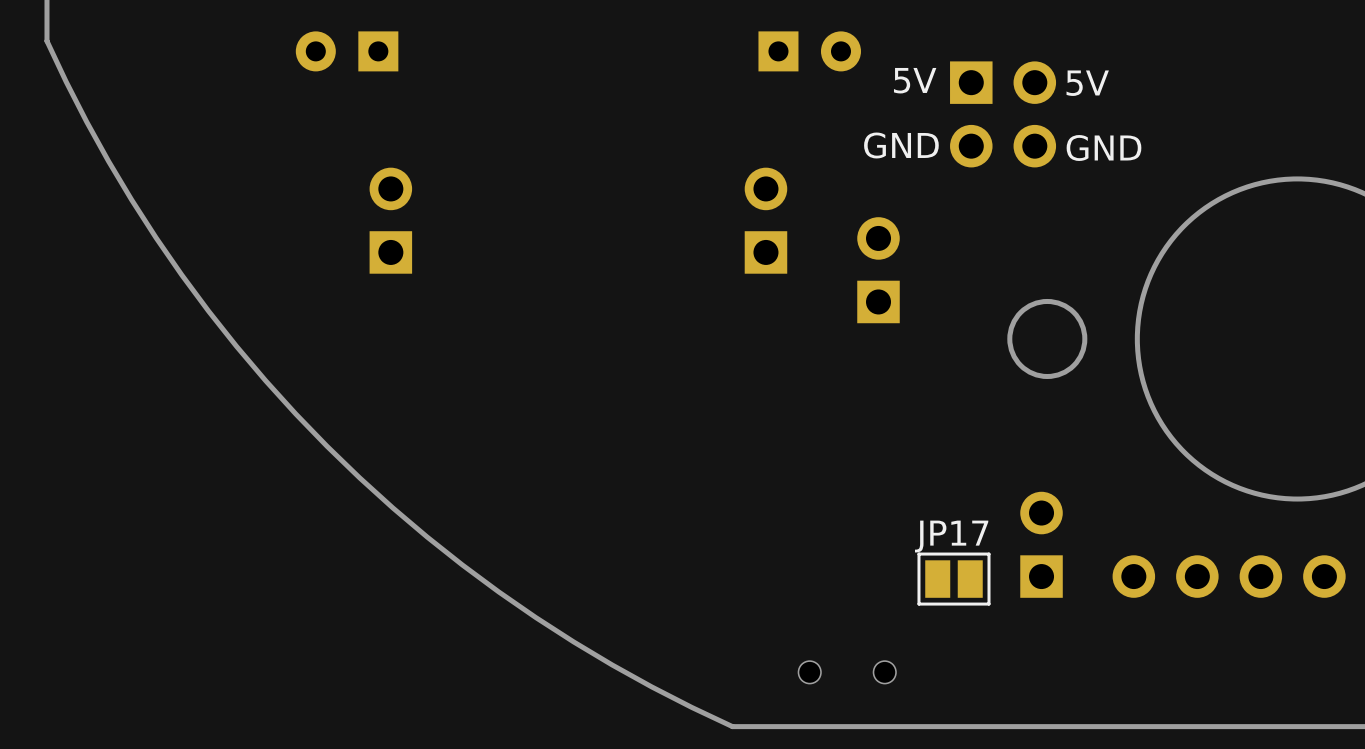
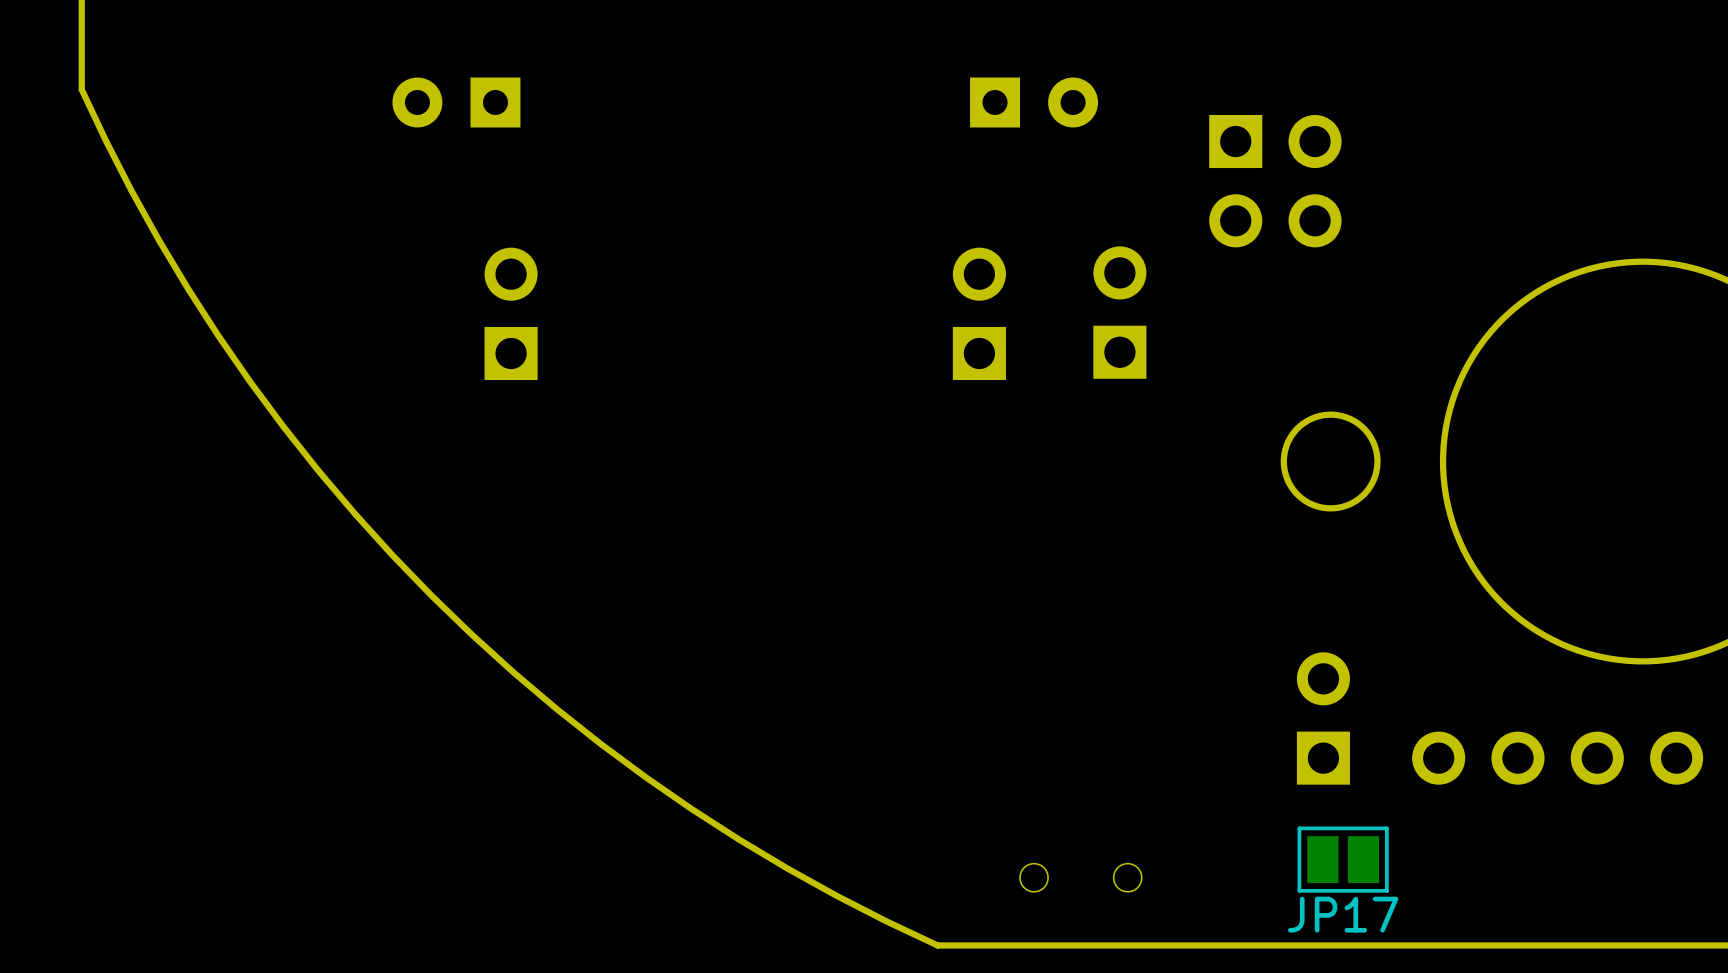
text: 5V (915, 80) -> none
text: 5V (1087, 83) -> none
text: GND (901, 145) -> none
text: GND (1103, 148) -> none
part position: (878, 270) -> (1119, 312)
JP17 name position: JP17 (951, 536) -> JP17 (1343, 914)
JP17 position: (953, 579) -> (1343, 859)

